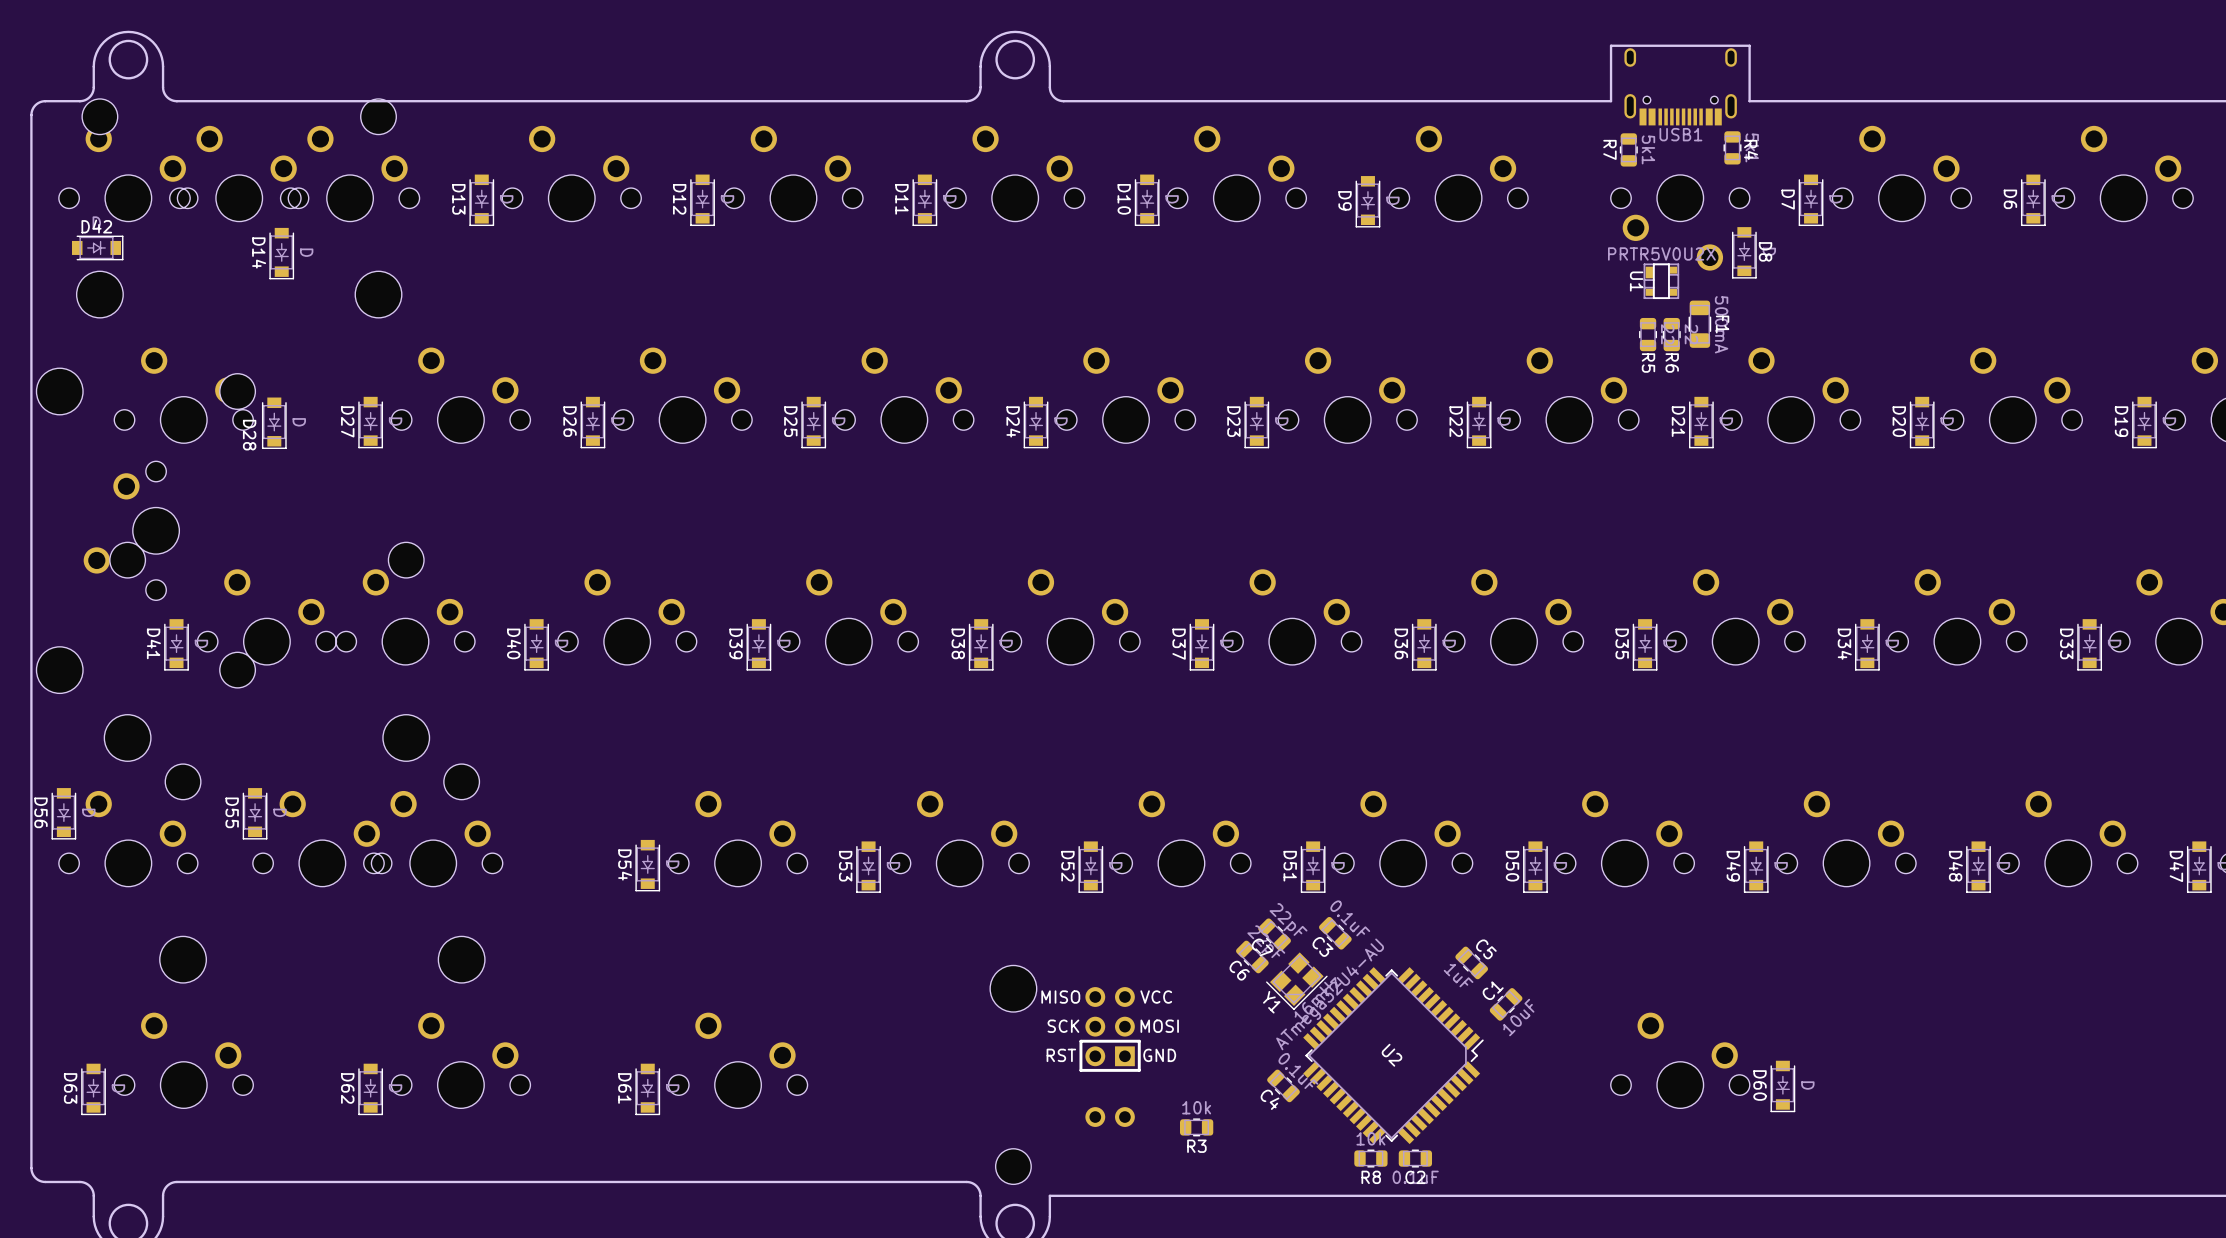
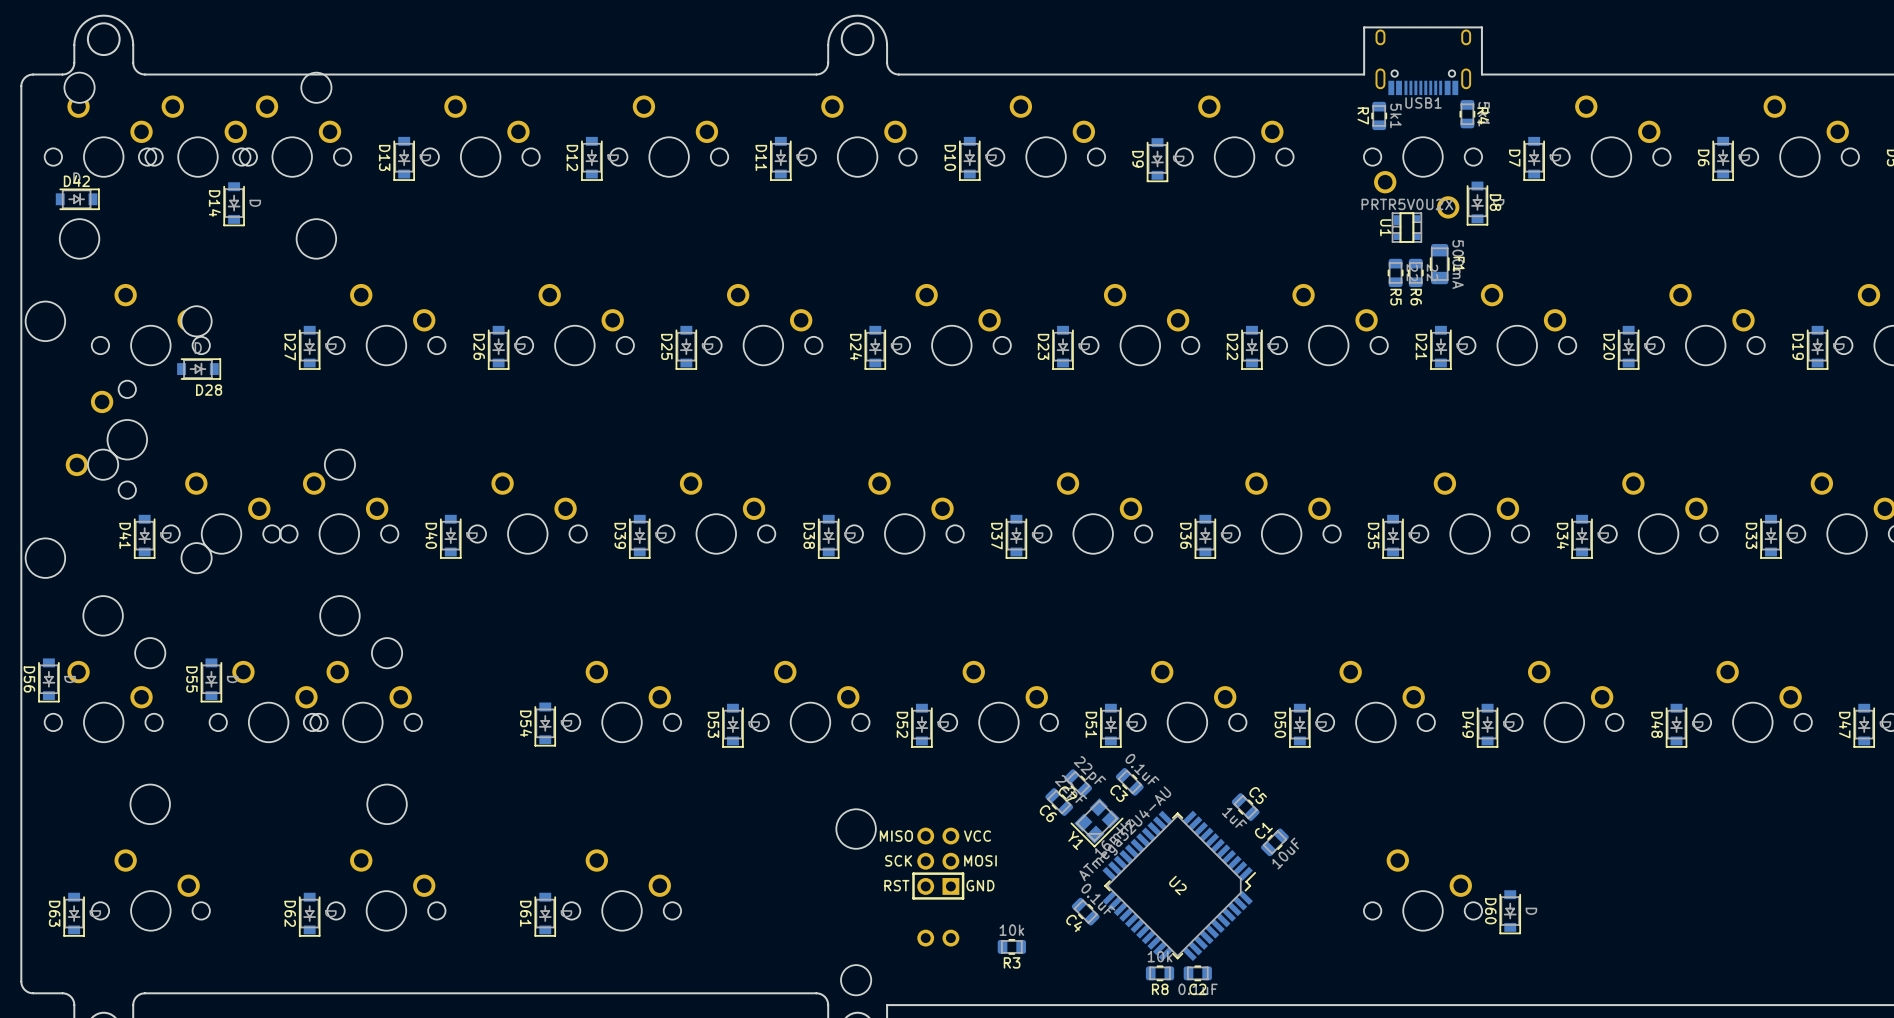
D28 rotation: 0° (274, 423) -> 90° counterclockwise (199, 369)
D28 position: (274, 423) -> (199, 369)

